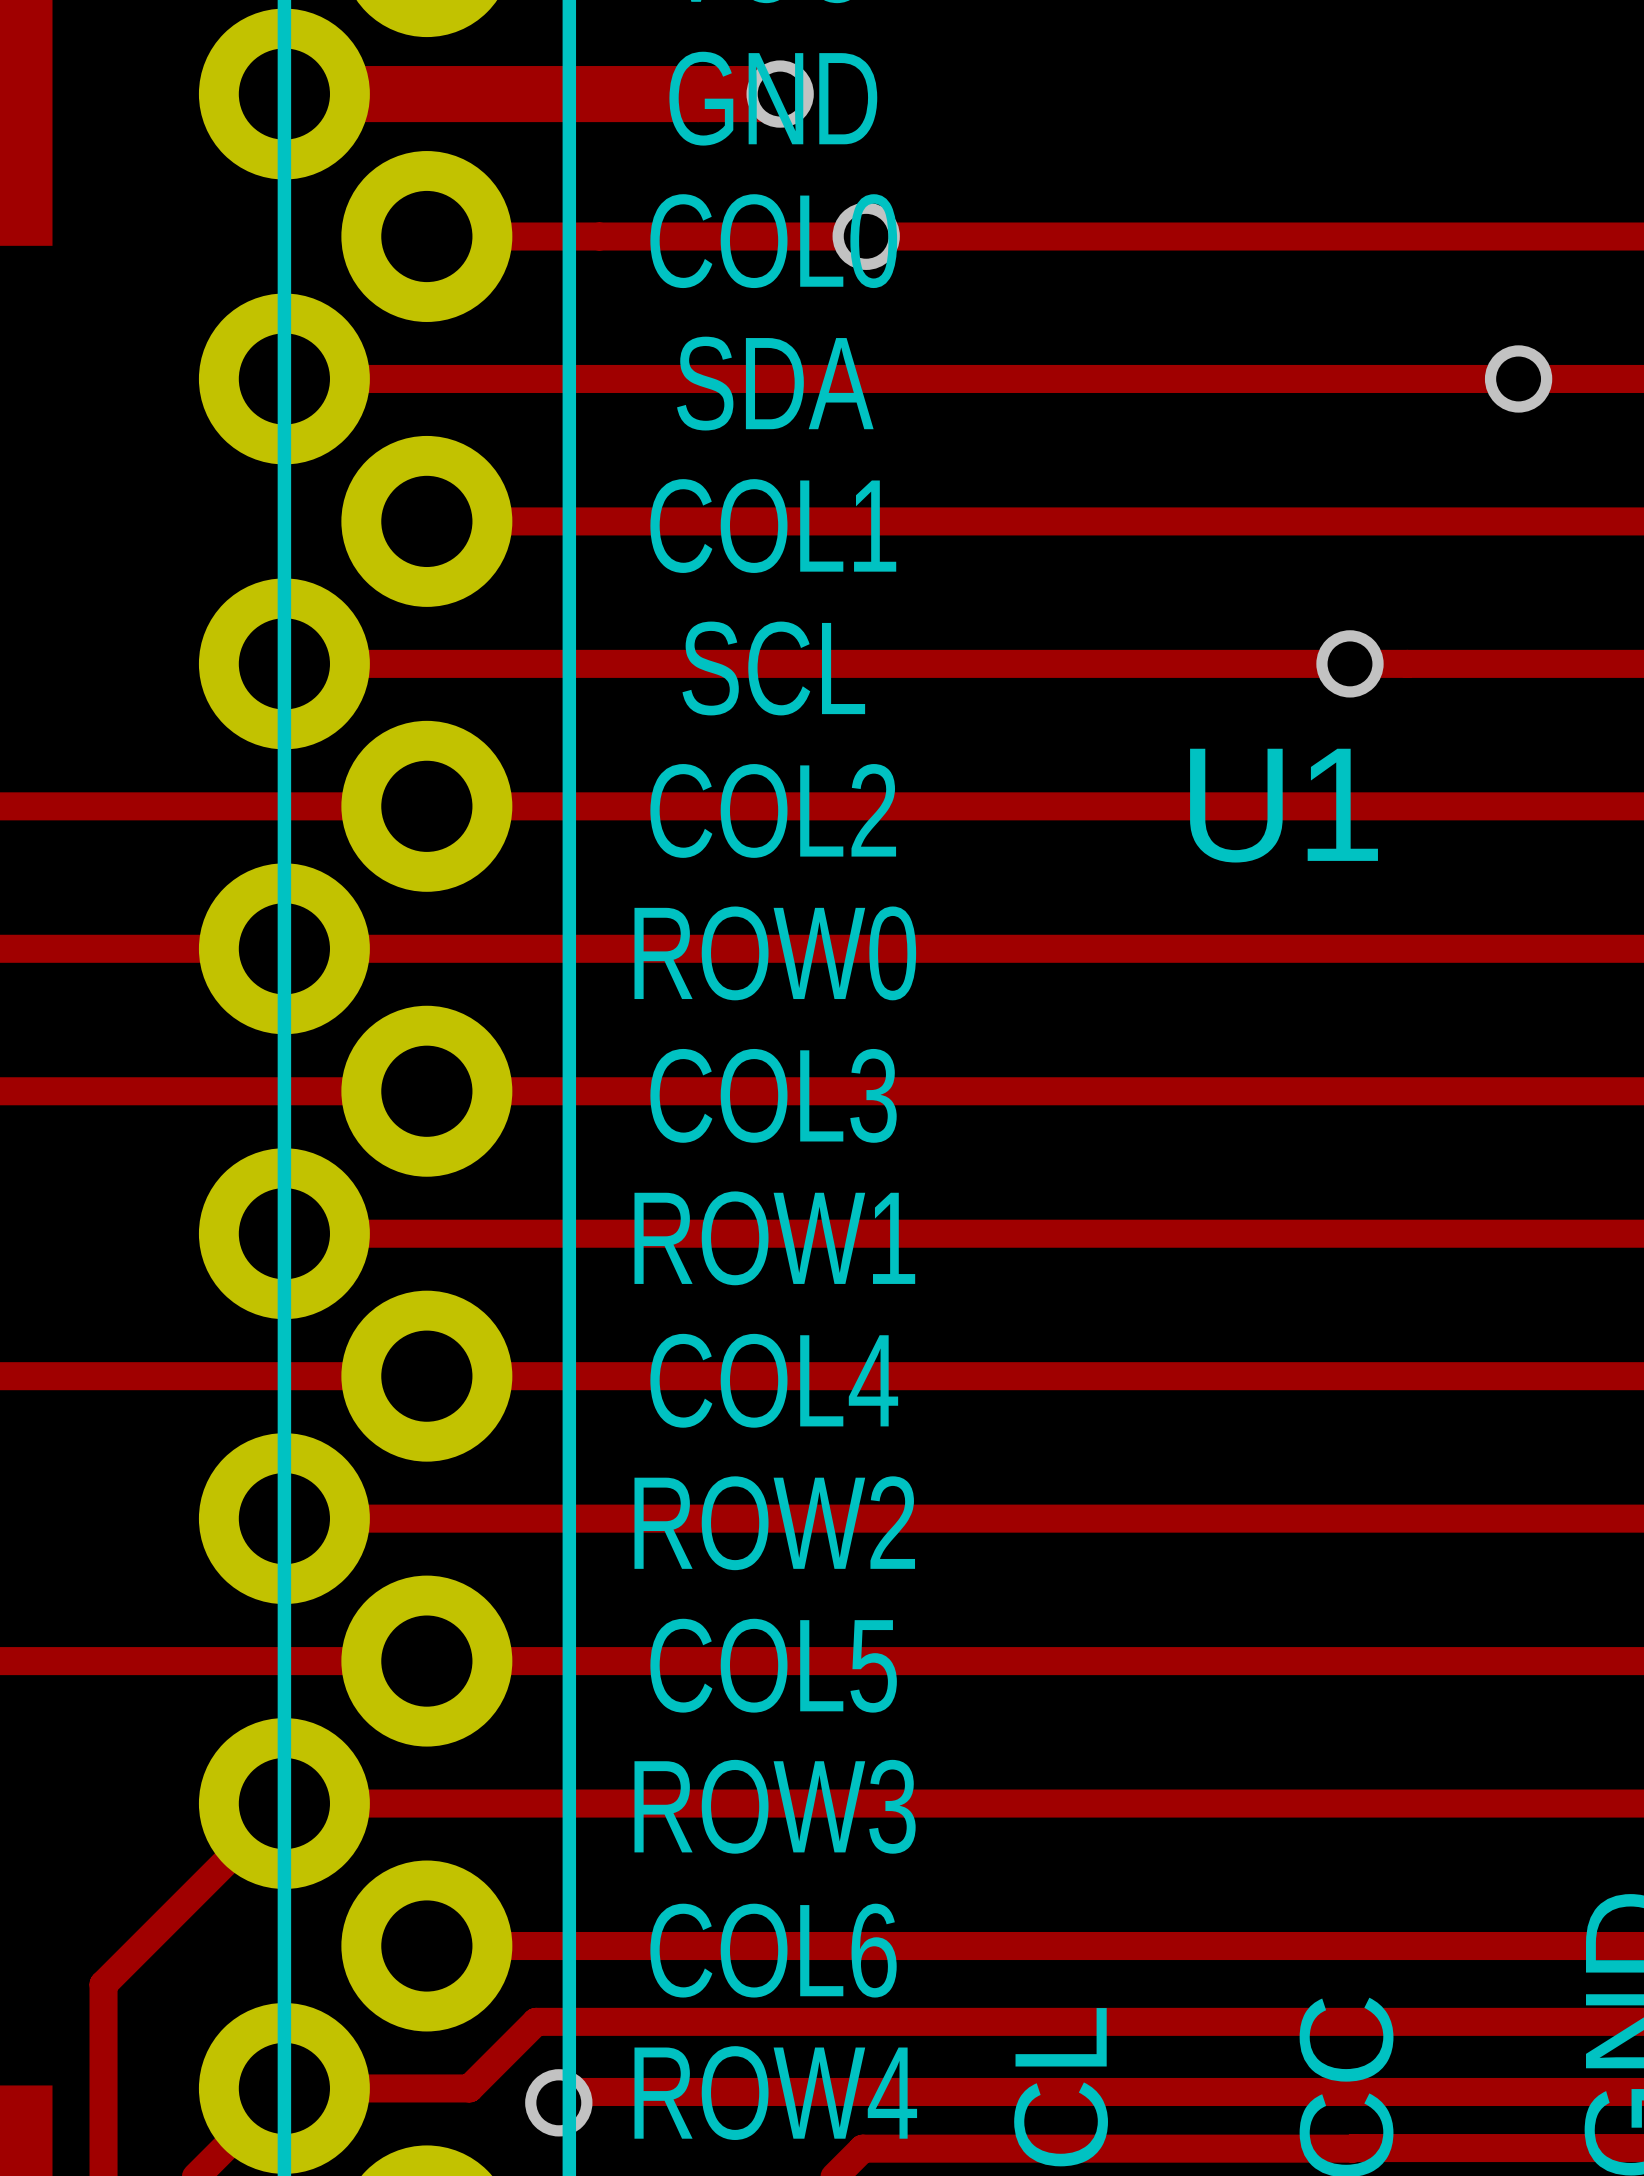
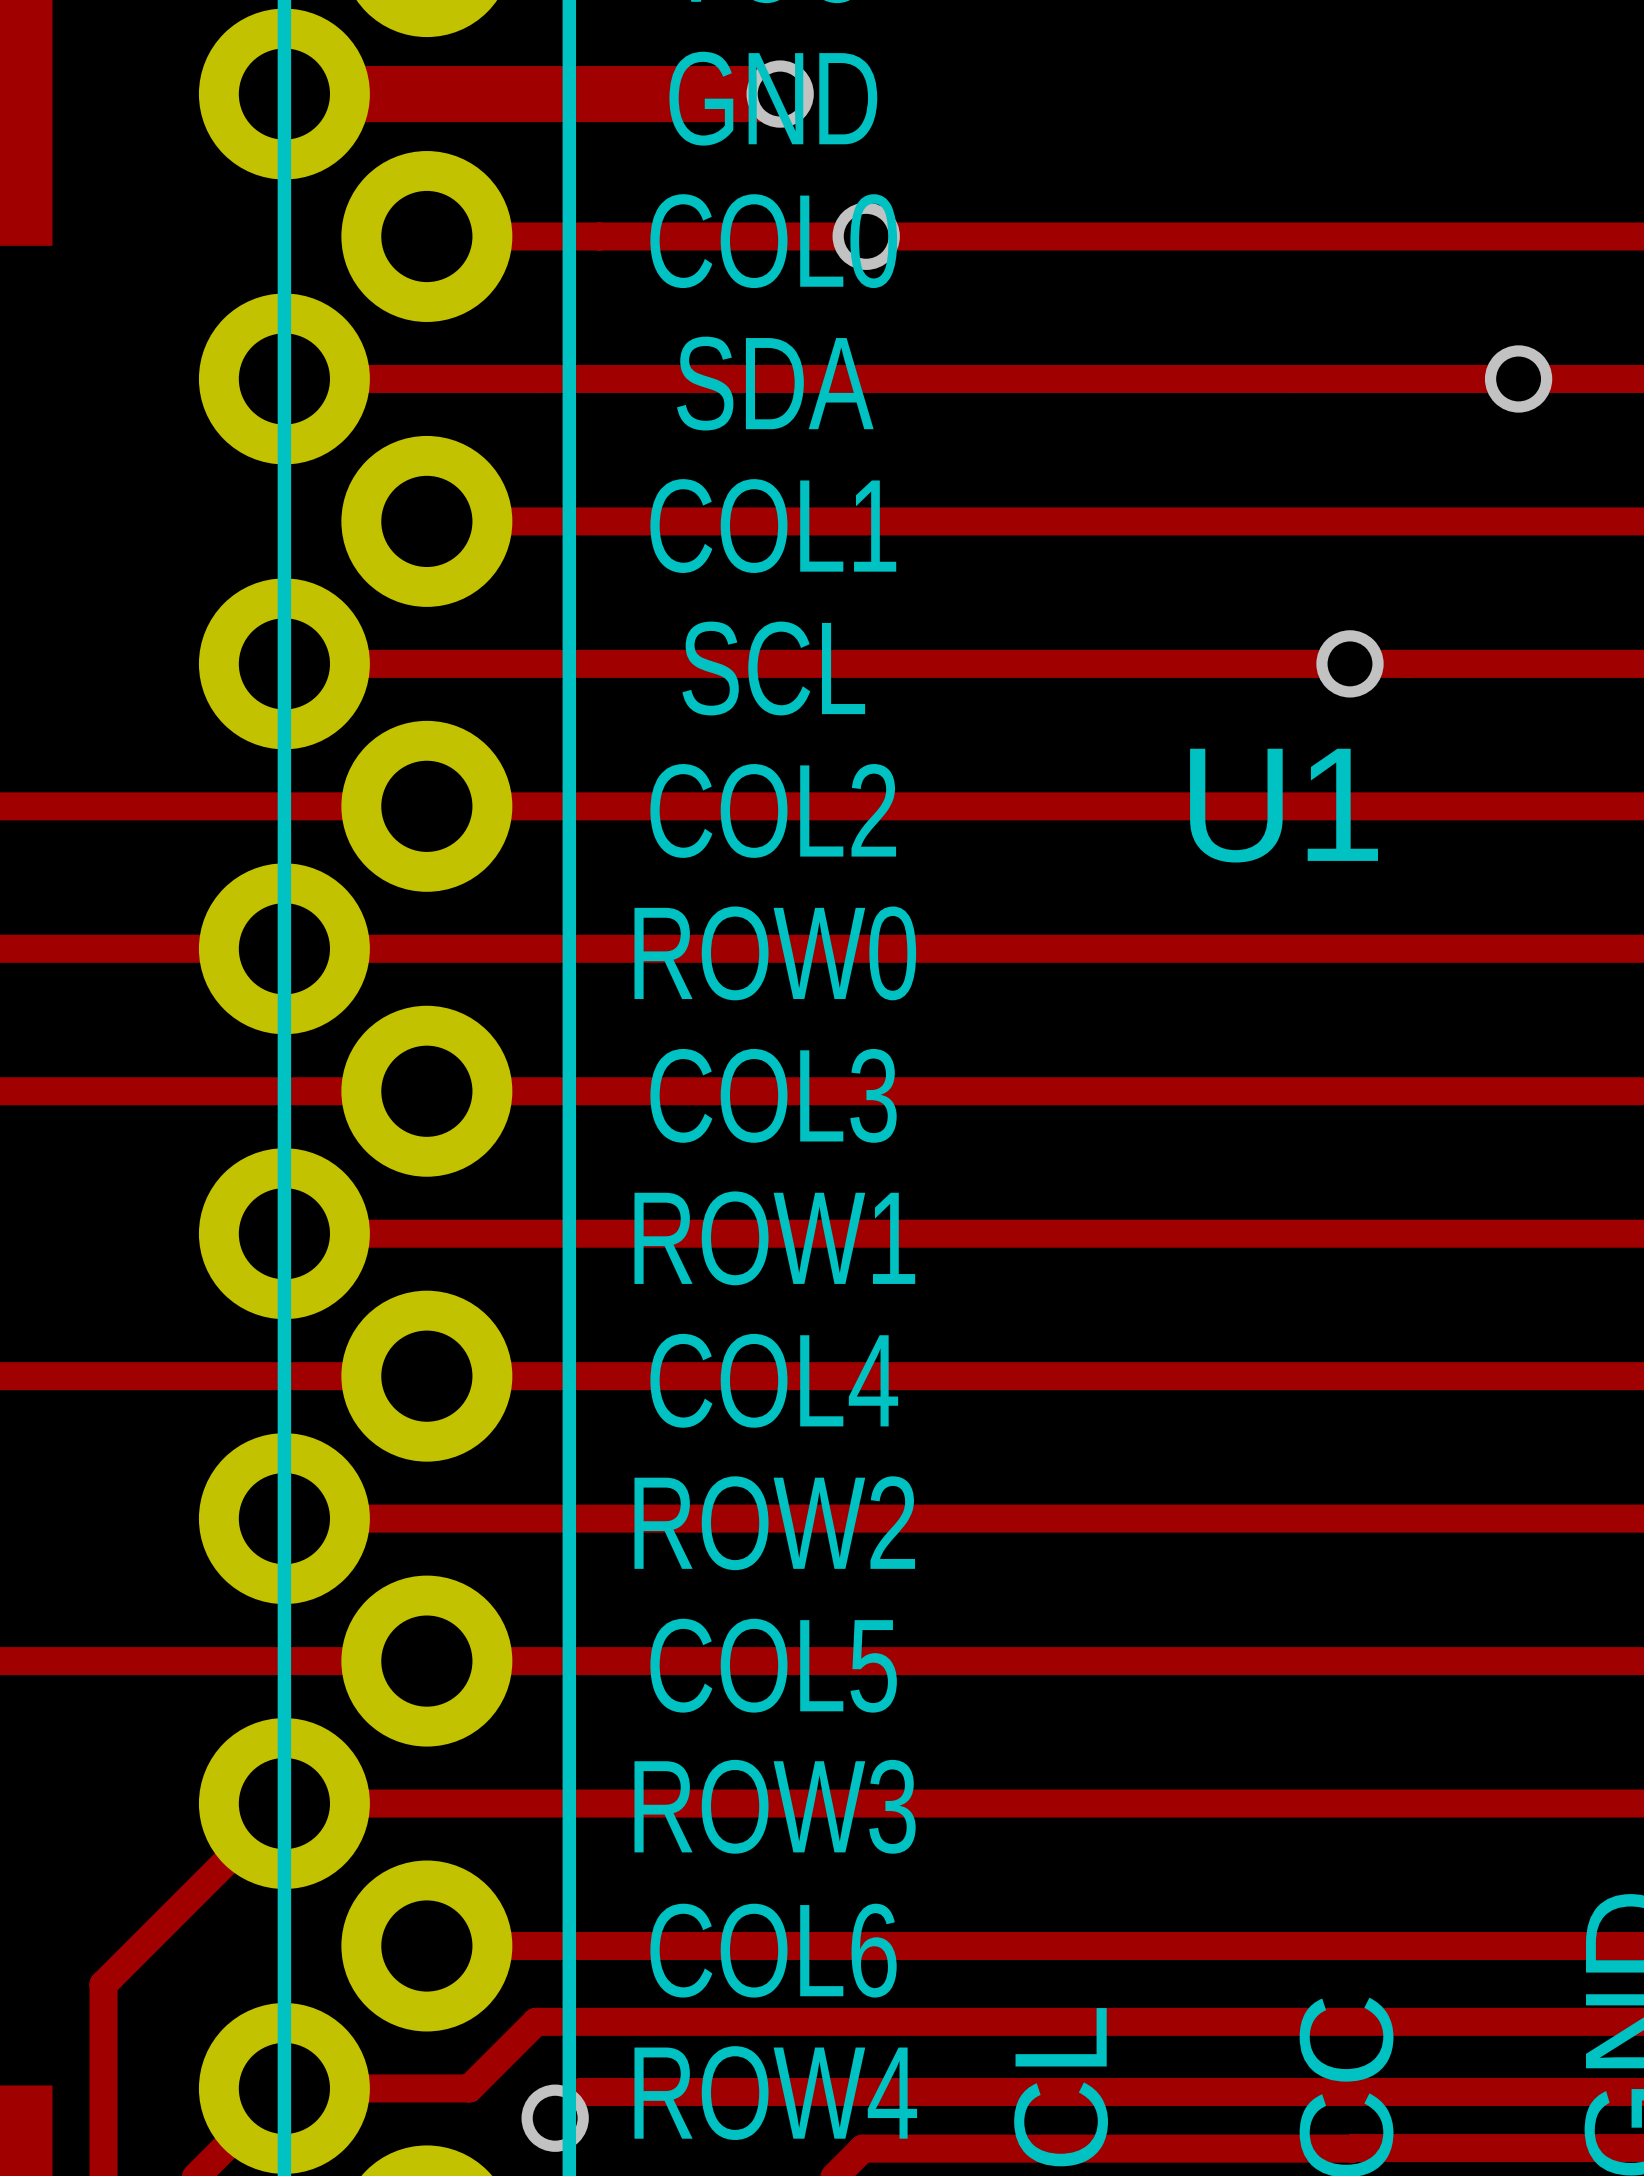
via position: (558, 2102) -> (555, 2118)

